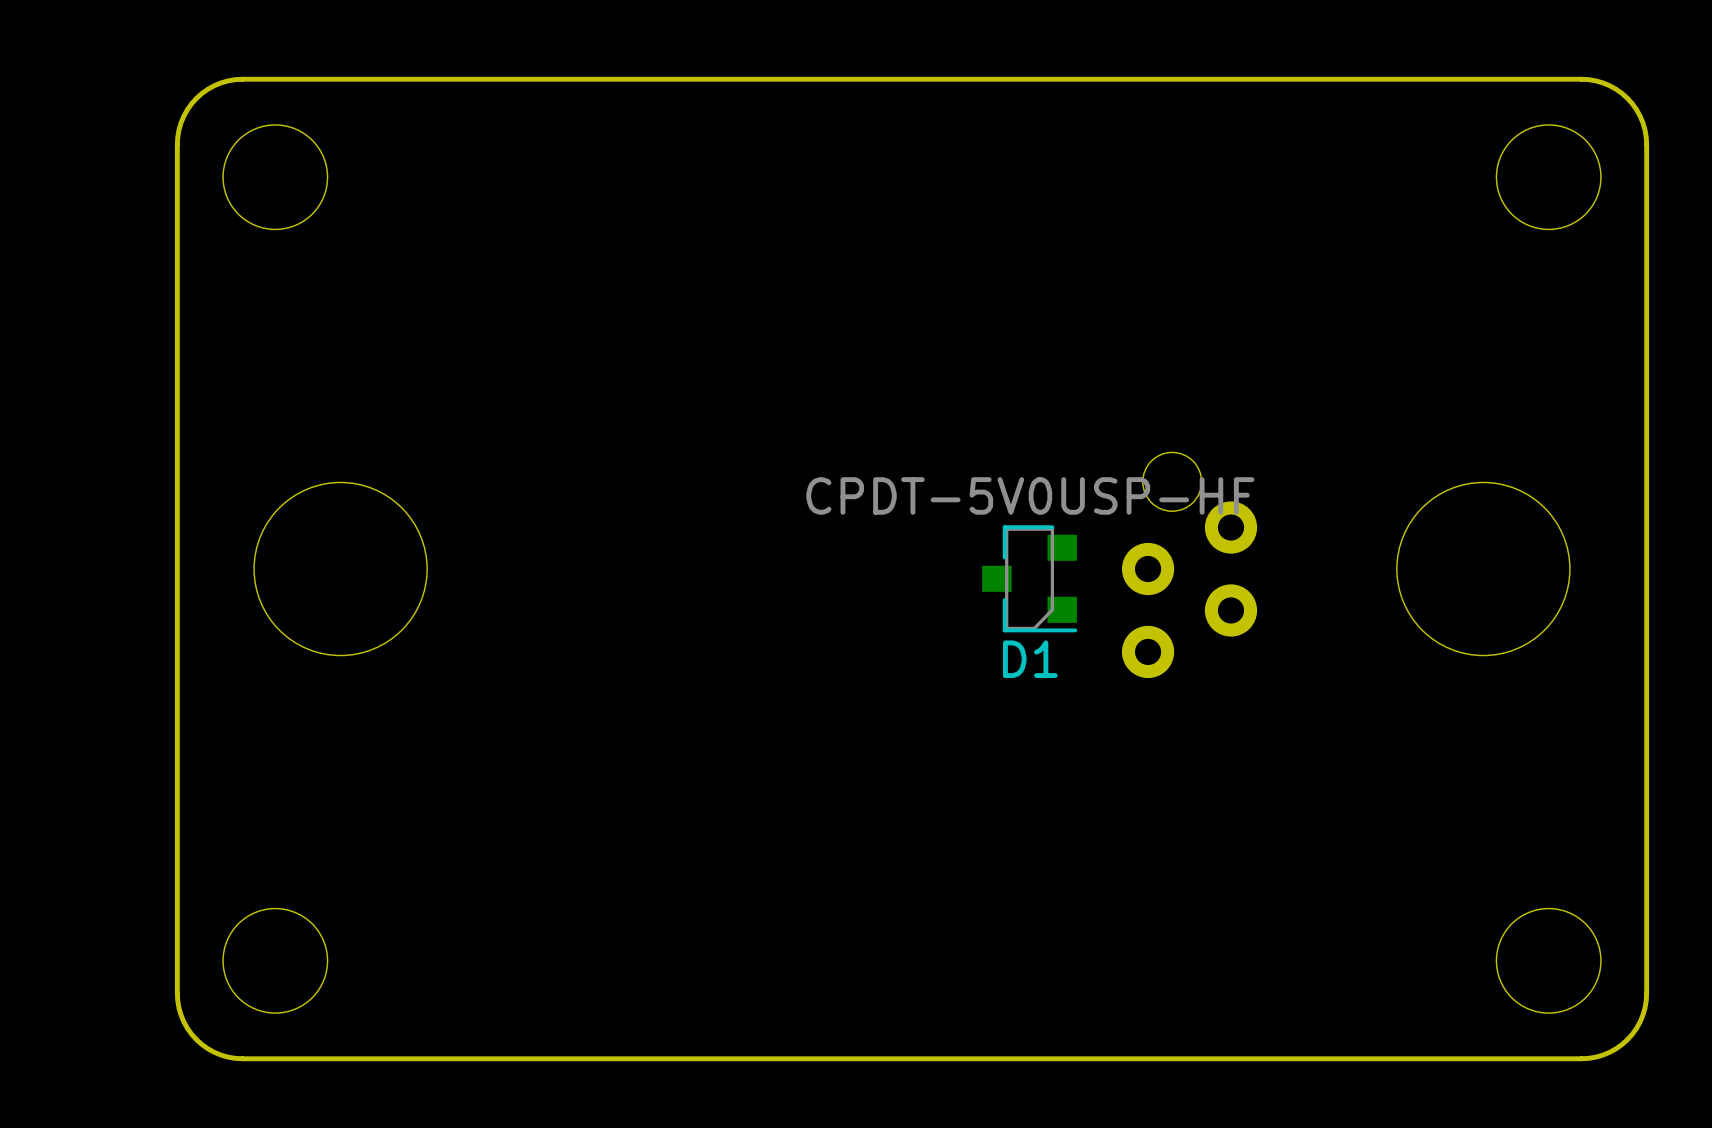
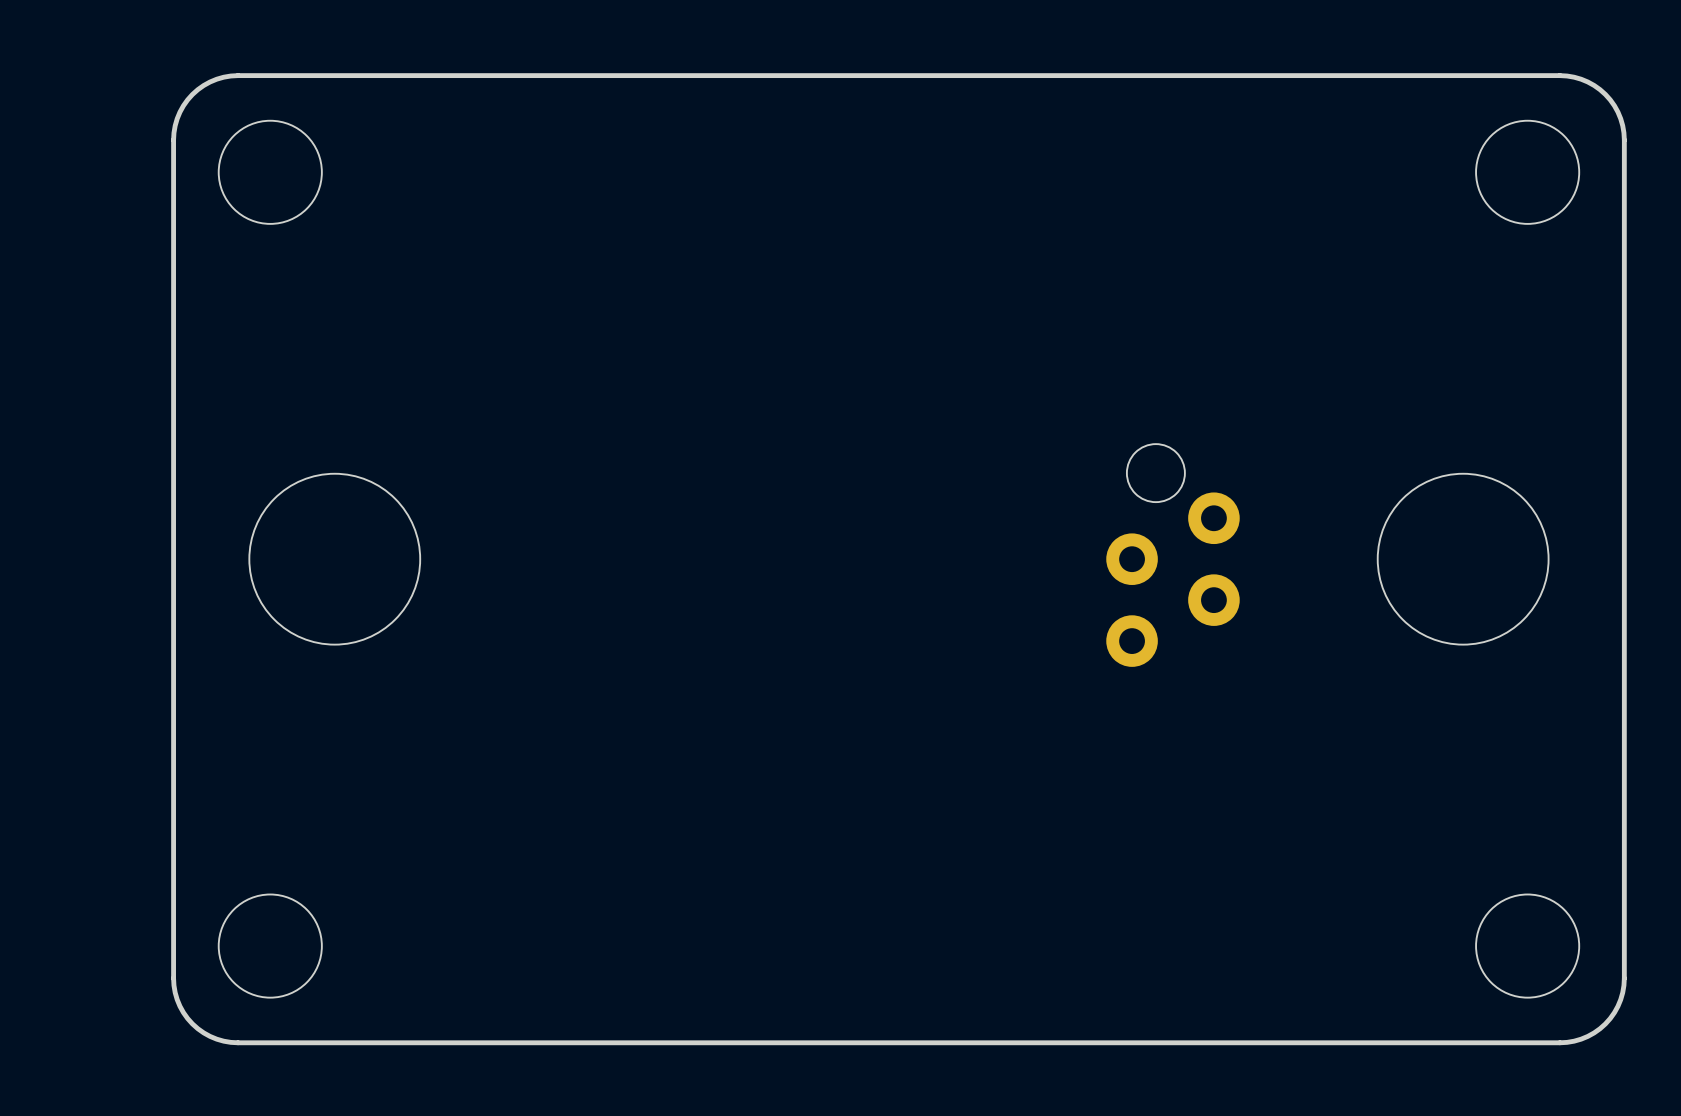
D1: CPDT-5V0USP-HF (1029, 578) -> none

